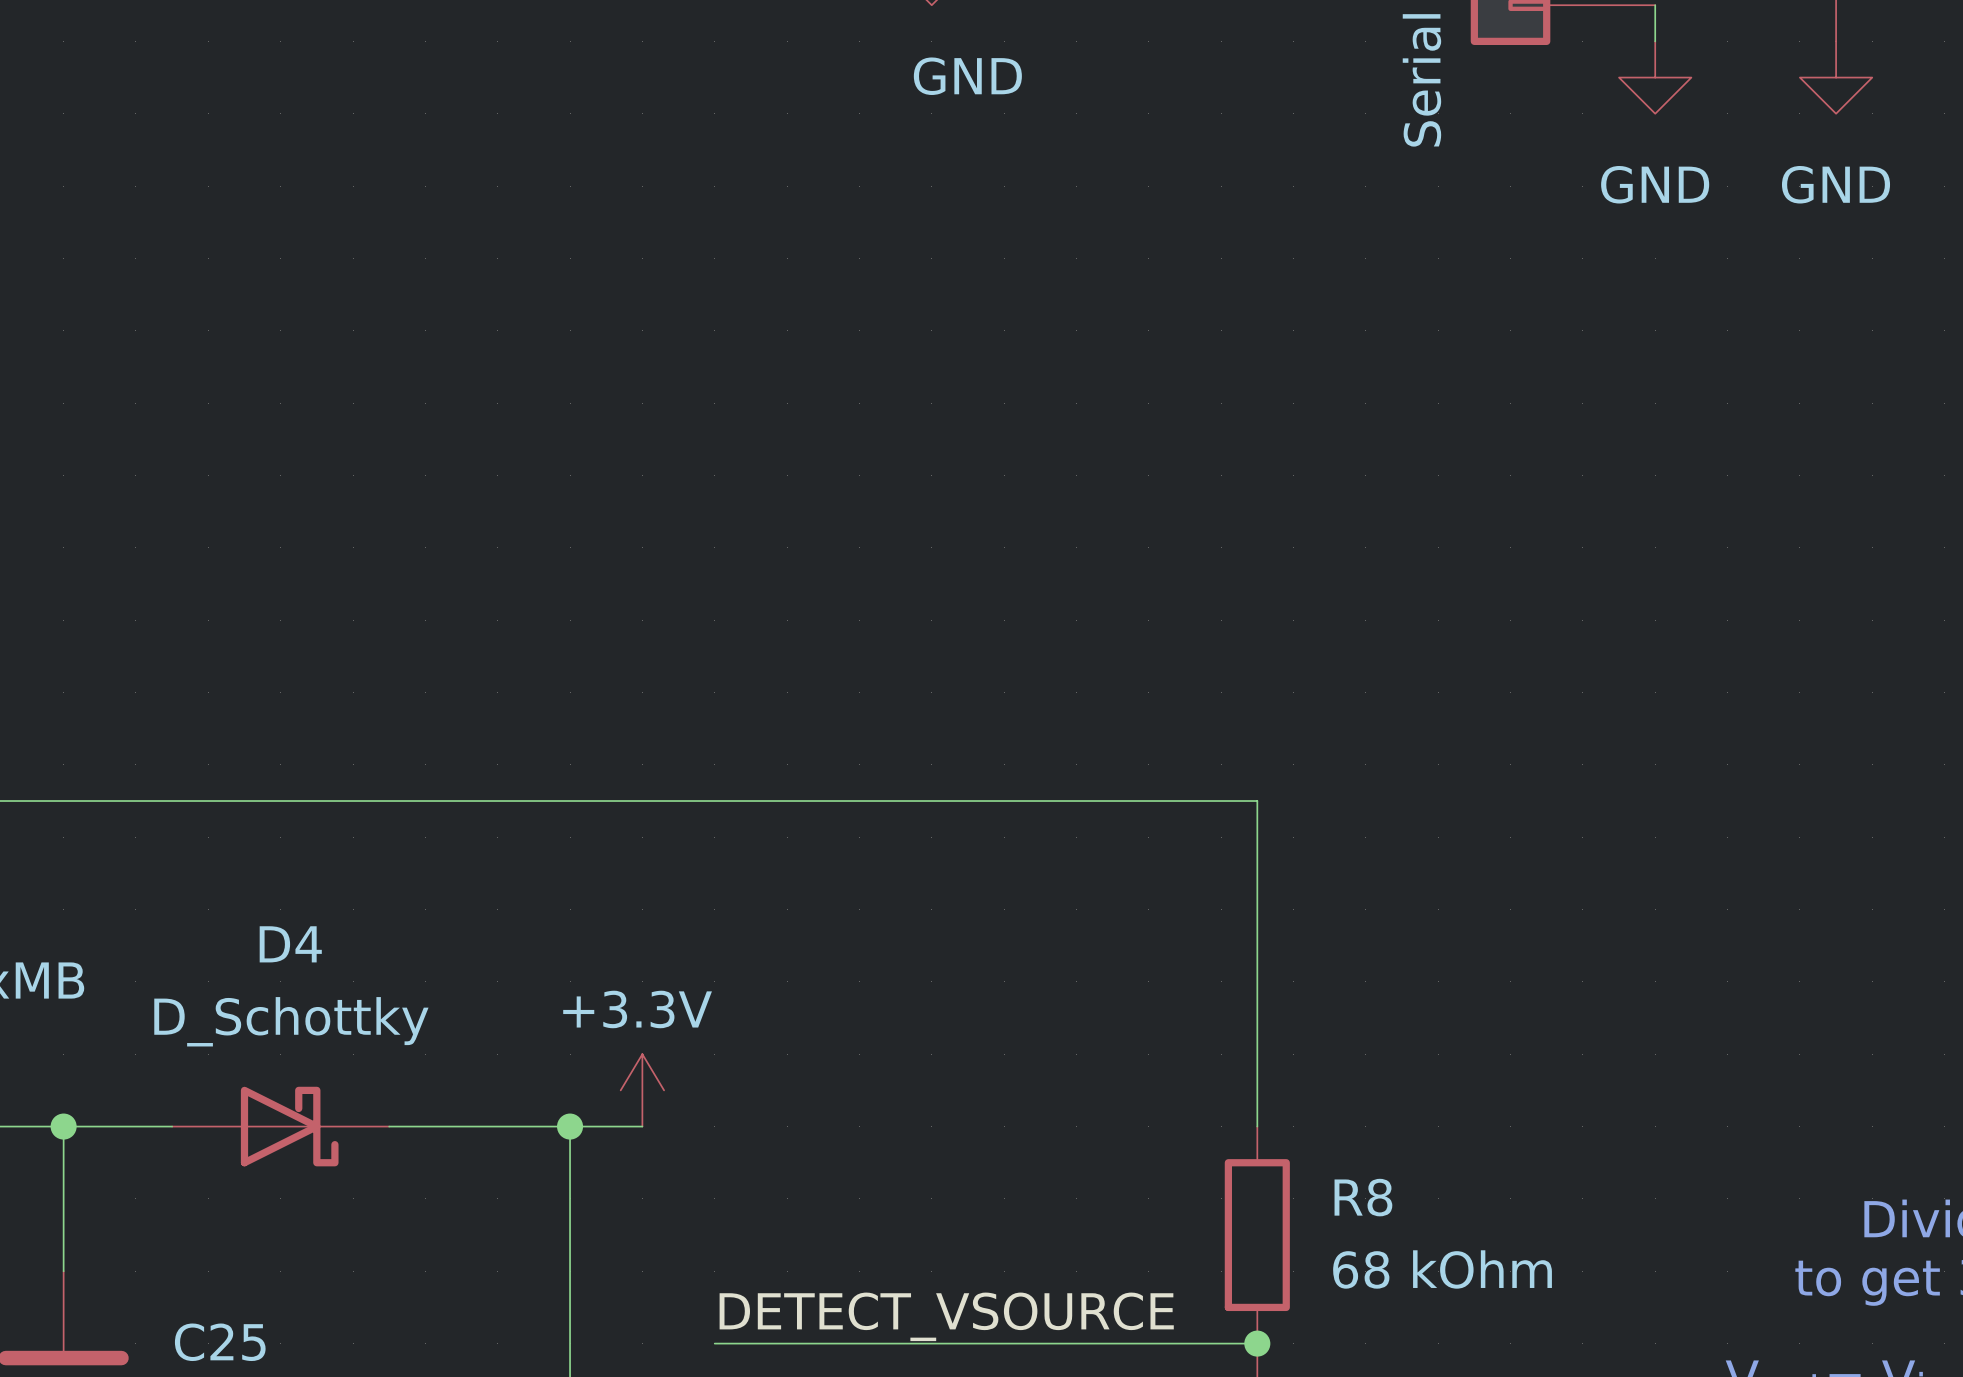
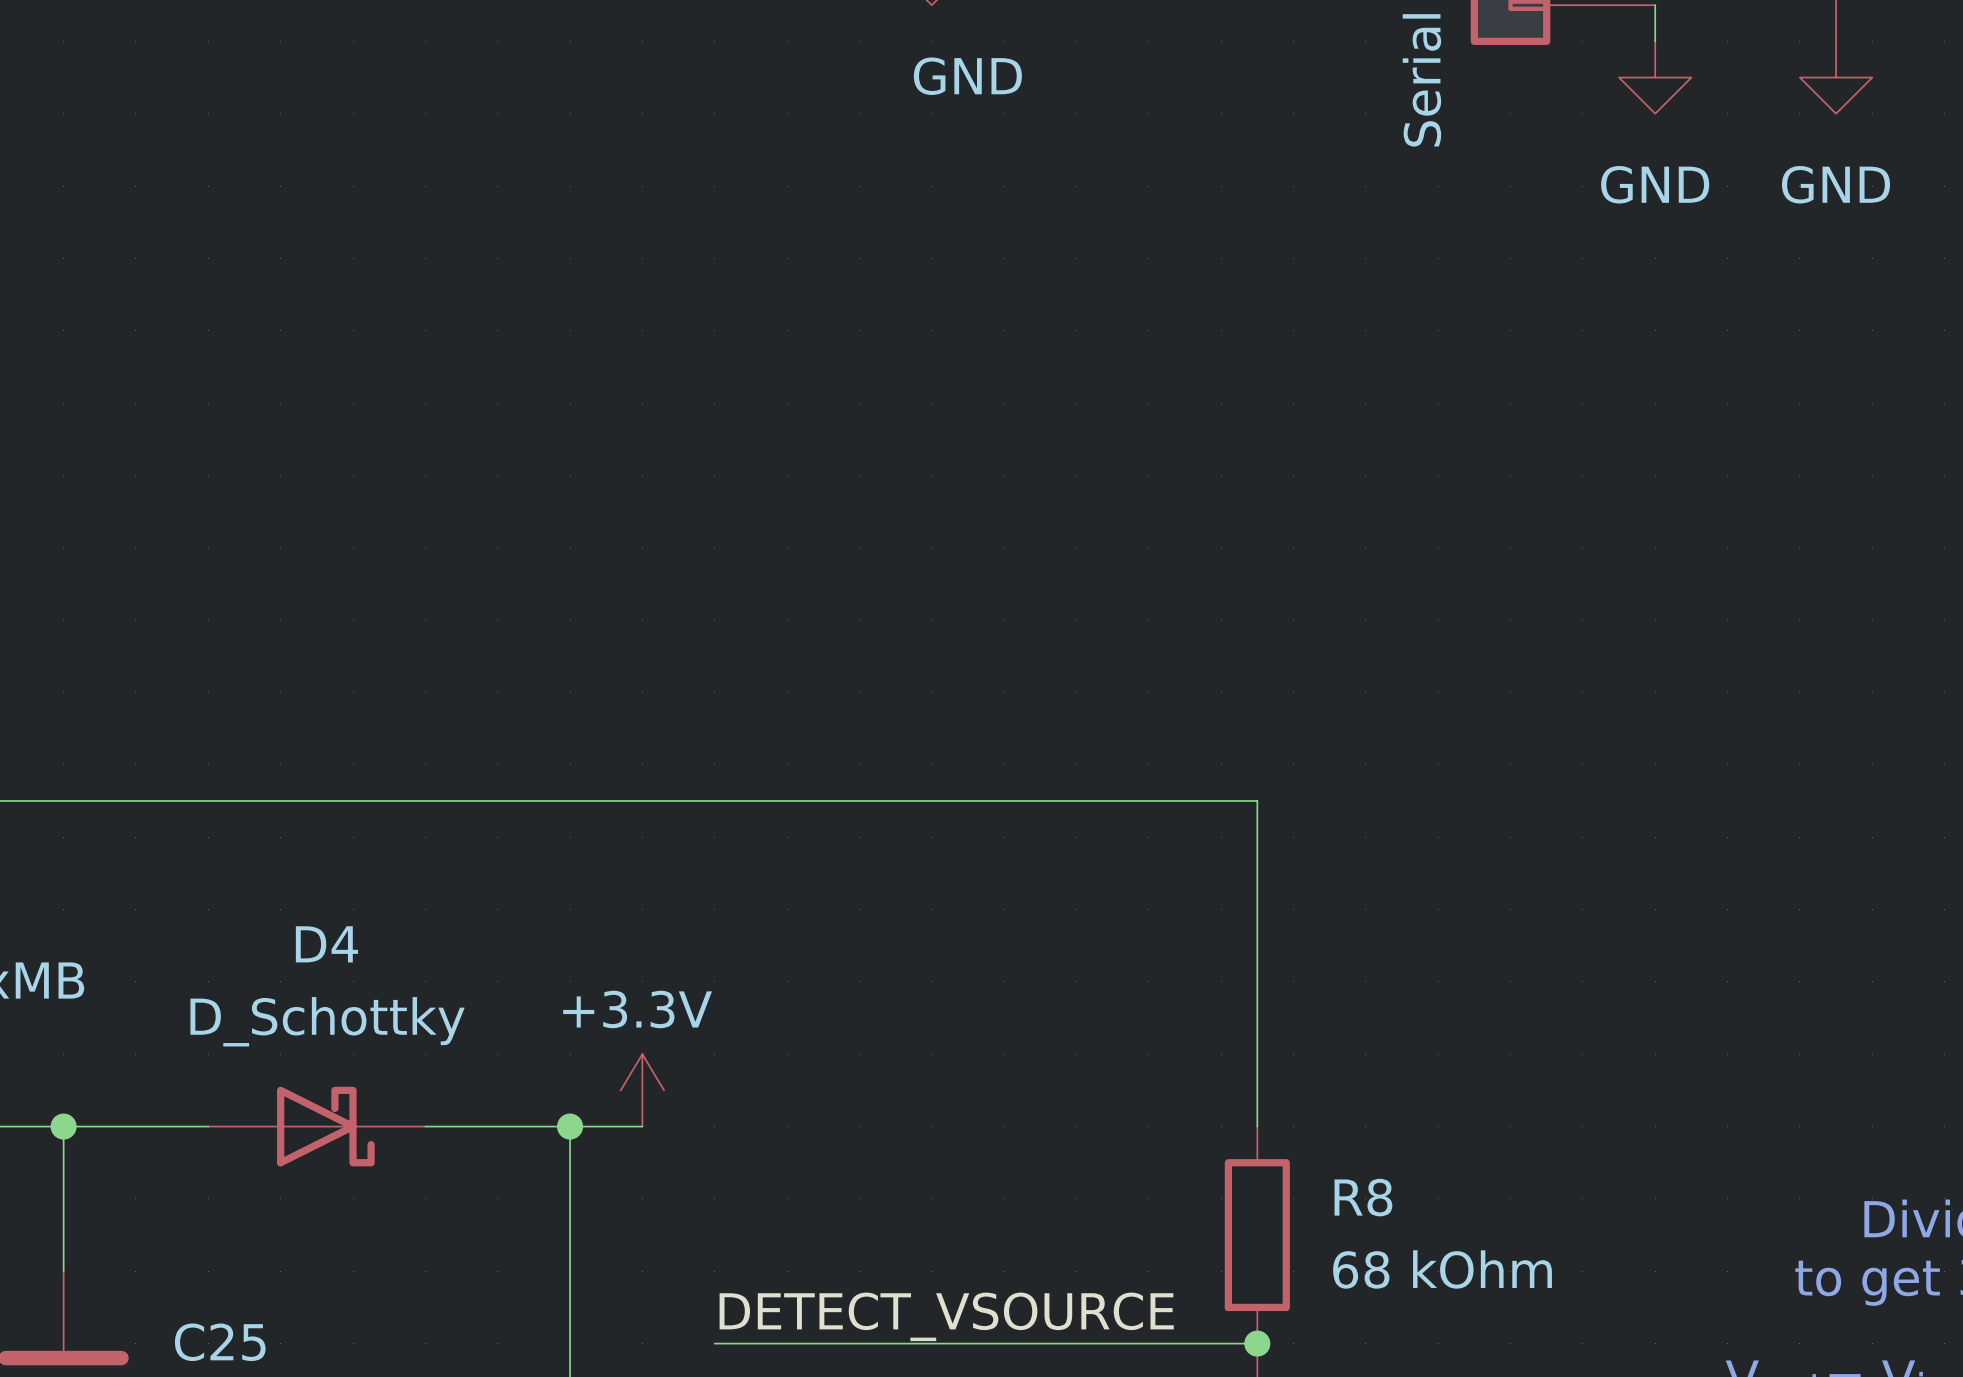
D4 position: (280, 1126) -> (316, 1126)

